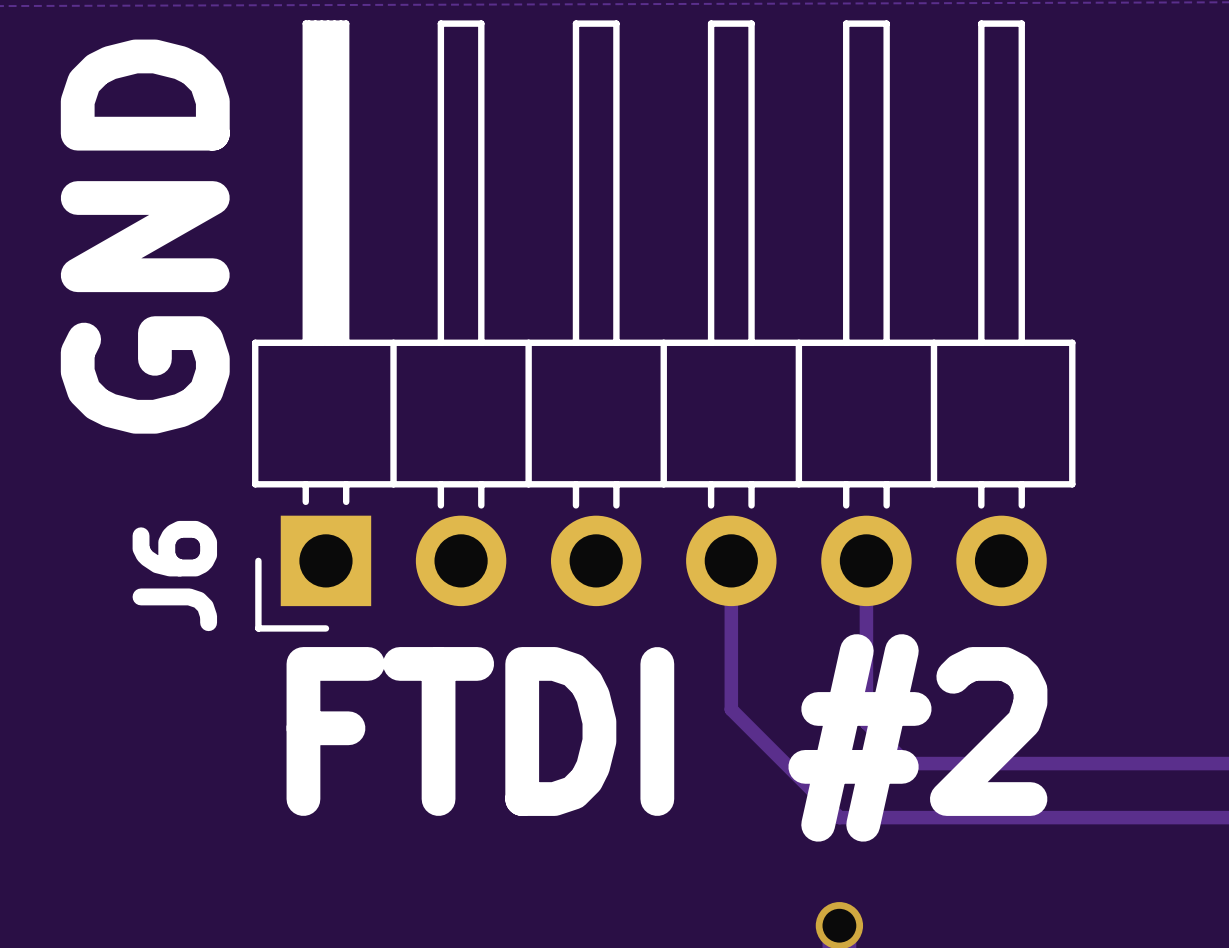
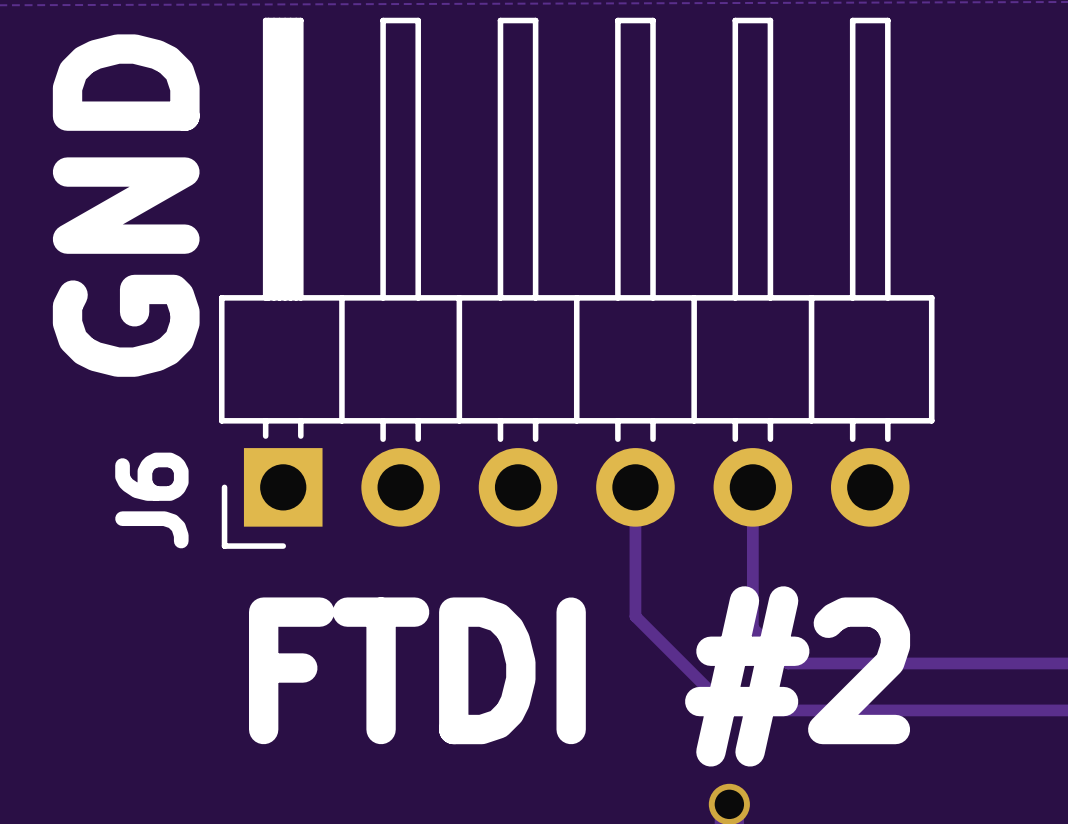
text position: FTDI #2 (666, 737) -> FTDI #2 (579, 676)

